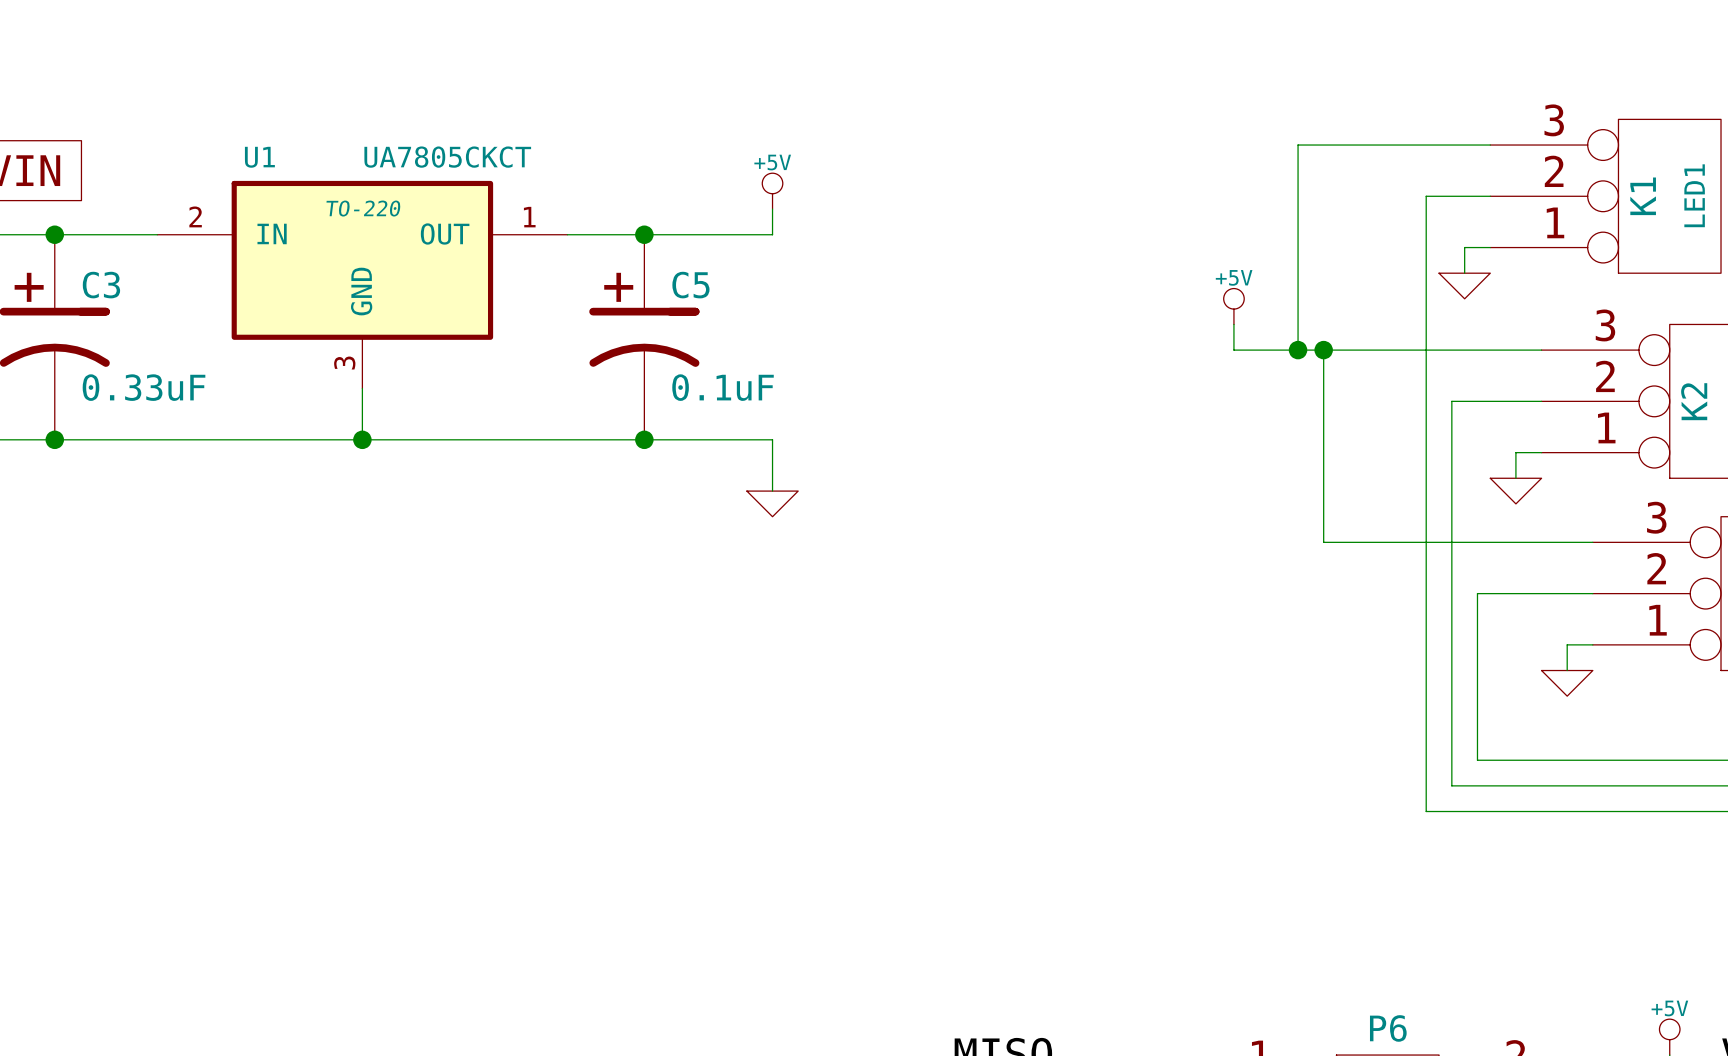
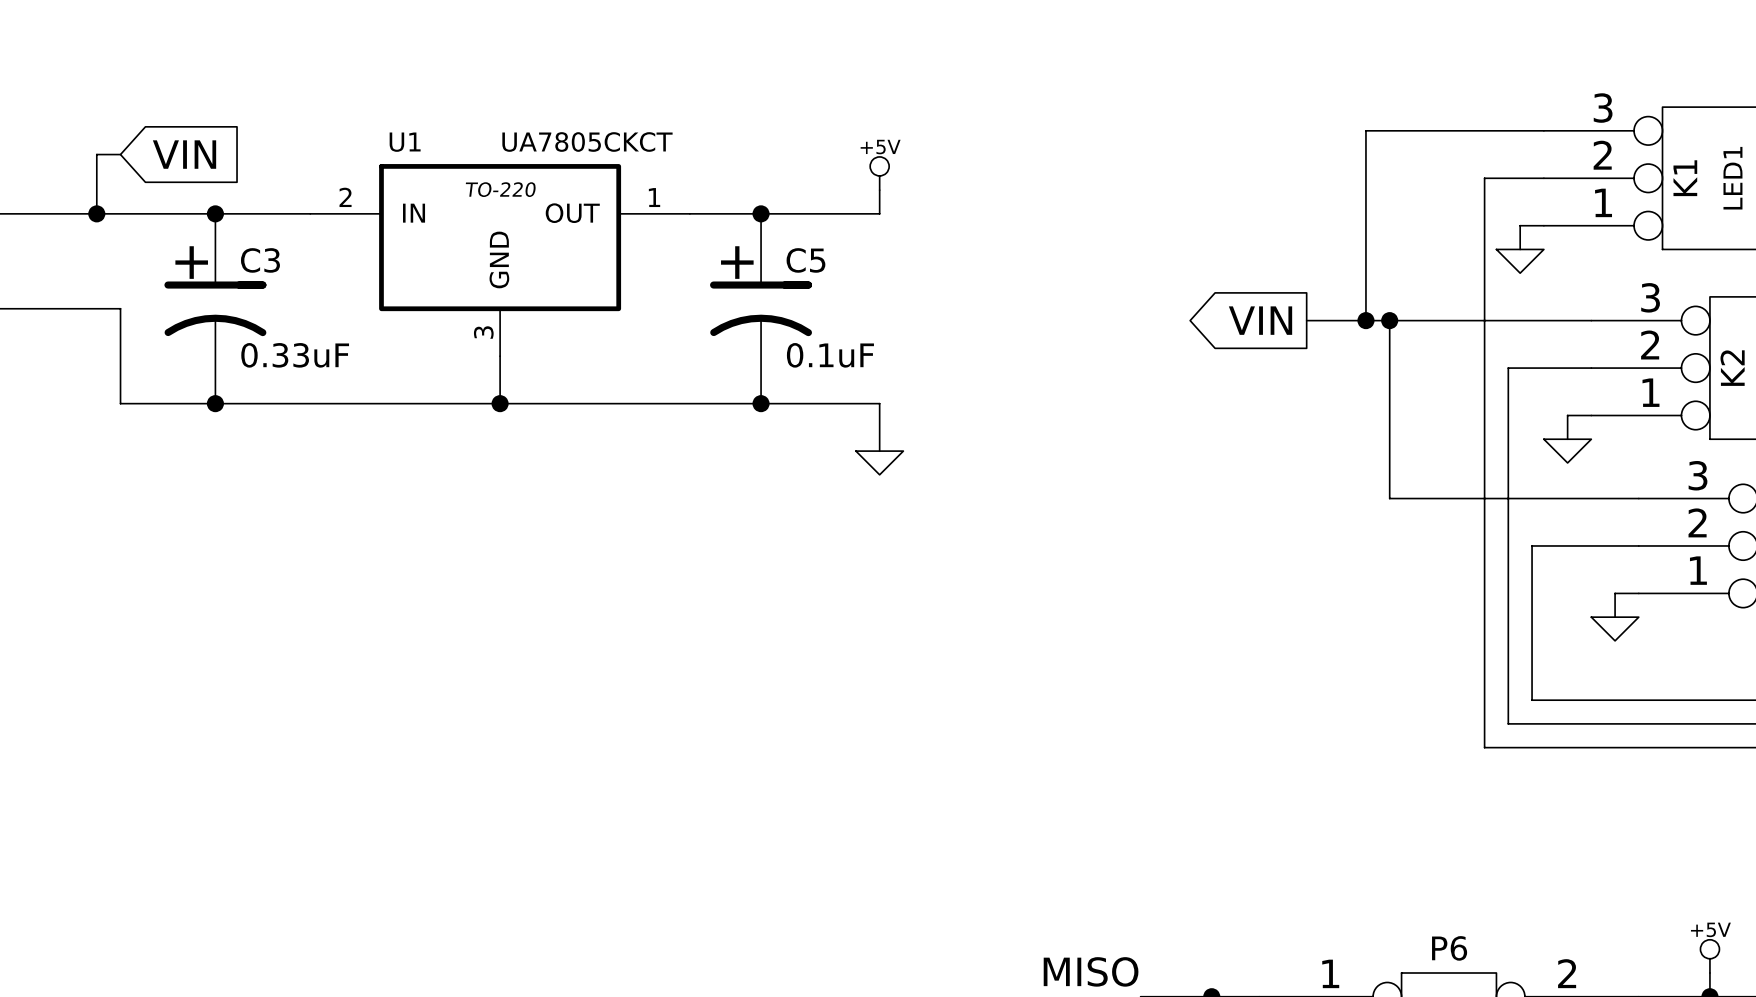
power symbol: +5V (1233, 306) -> none
global label: none -> VIN (1260, 320)

